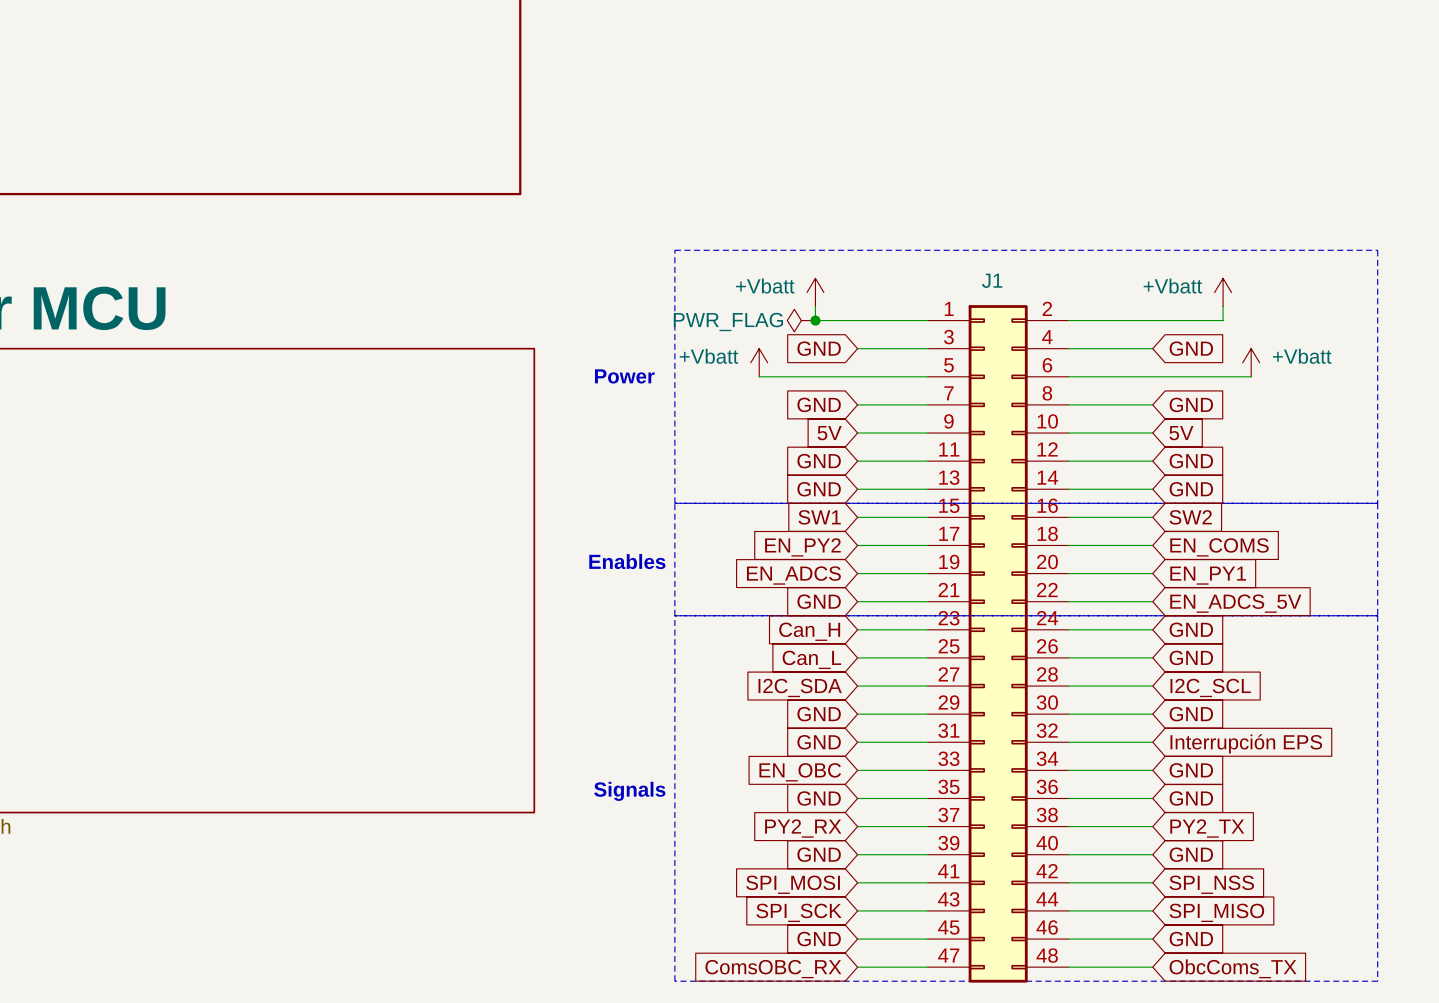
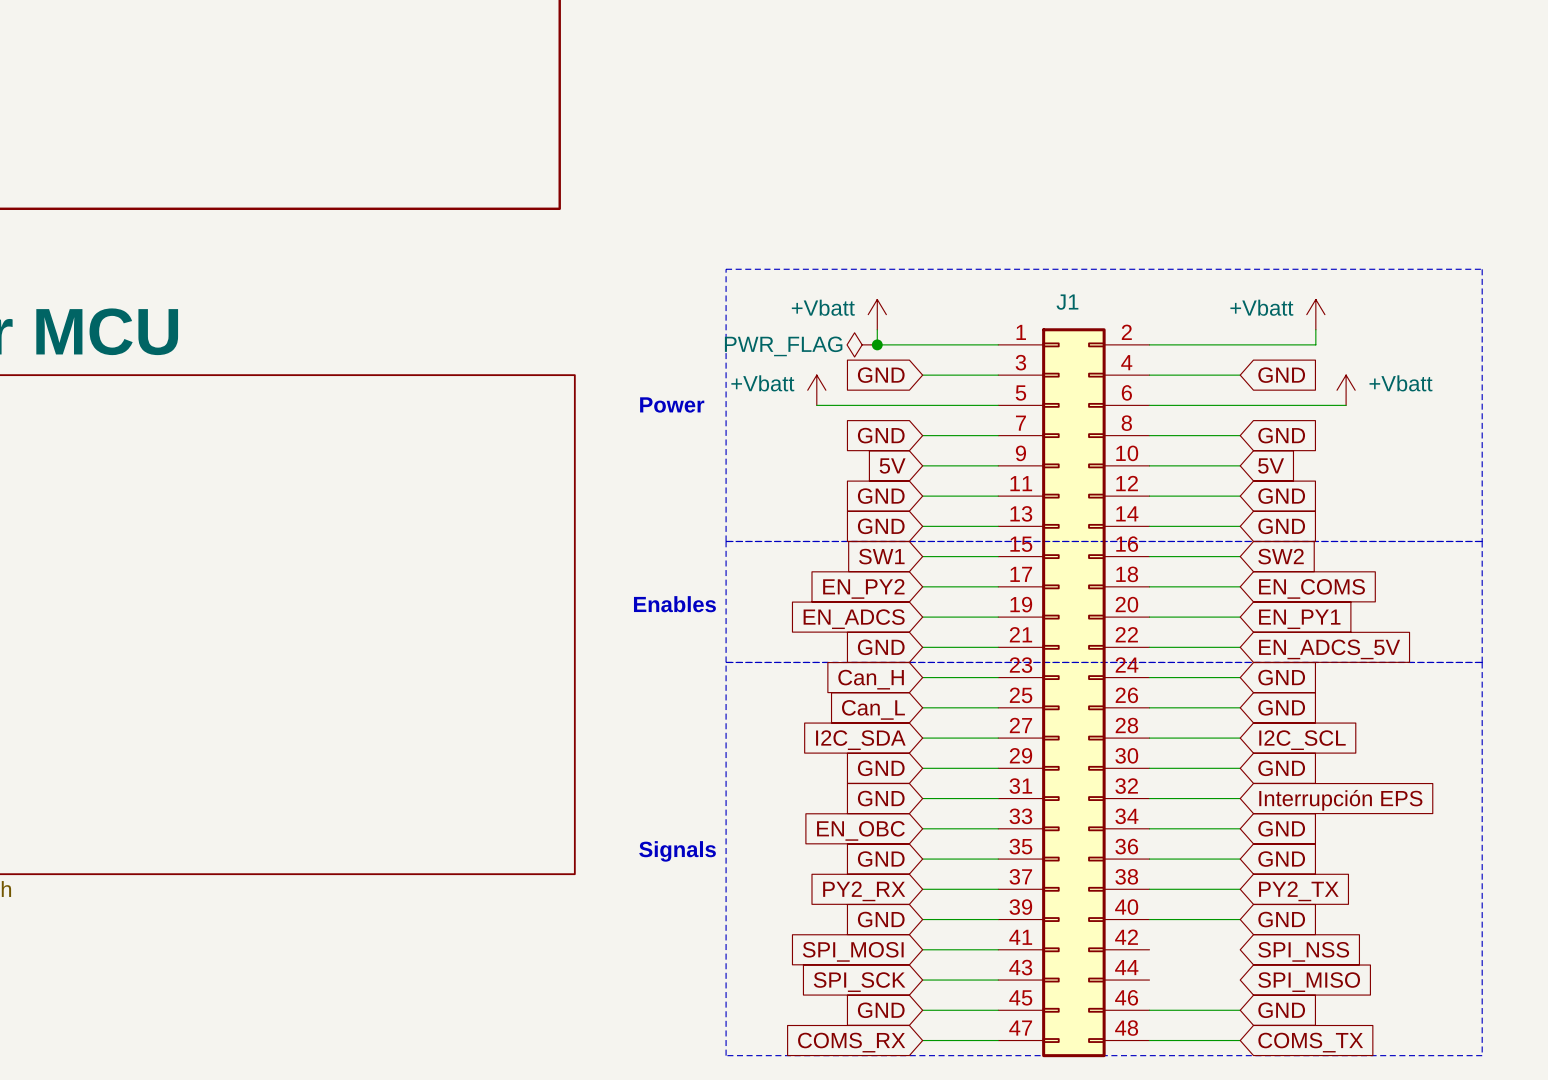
wire: (1068, 882) (1152, 882) -> none
wire: (1068, 910) (1152, 910) -> none
global label: ObcComs_TX (1233, 968) -> COMS_TX (1310, 1042)
global label: ComsOBC_RX (773, 969) -> COMS_RX (851, 1042)

